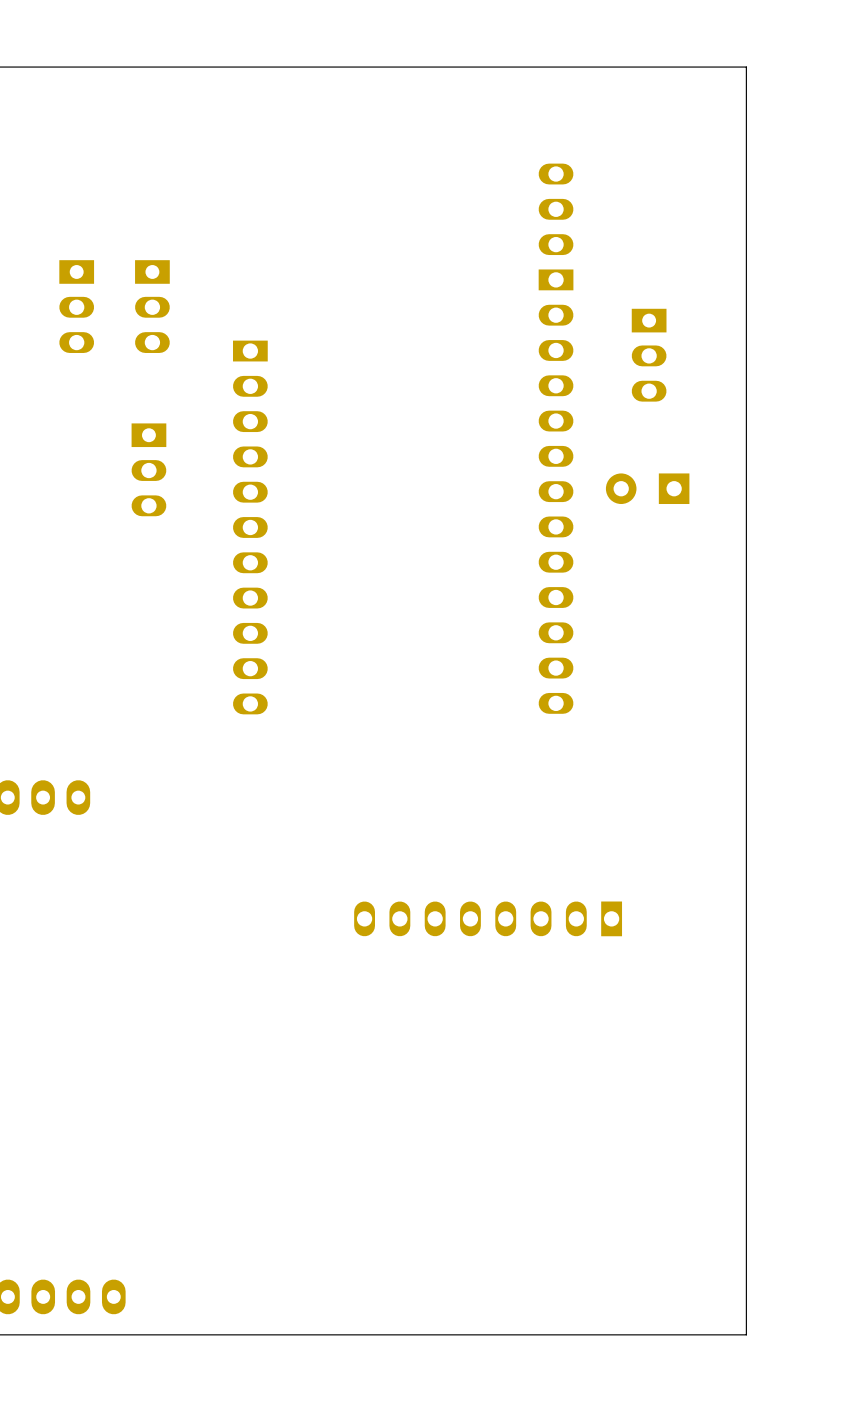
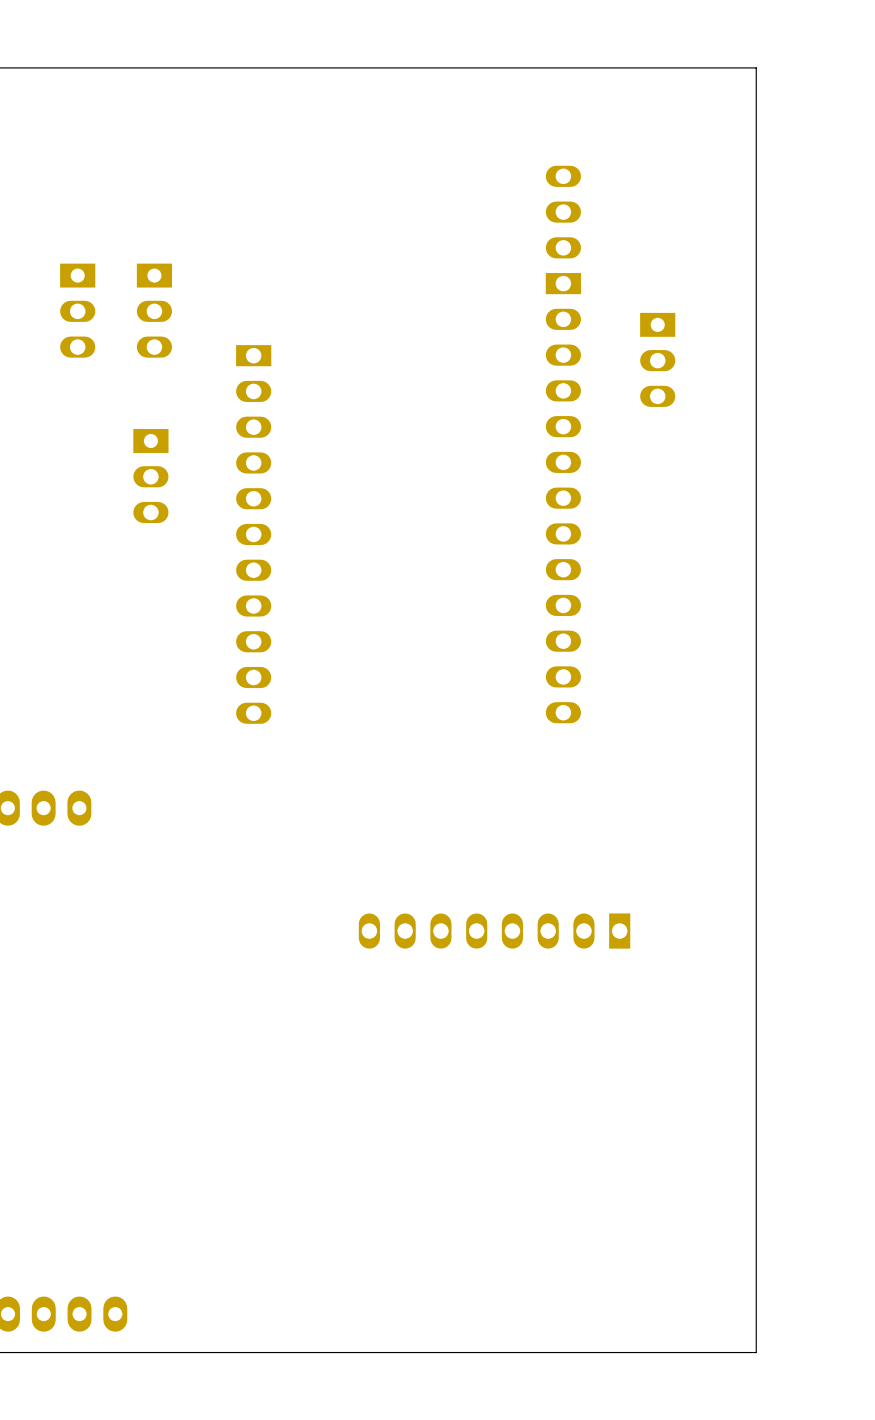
part: (647, 488) -> none

